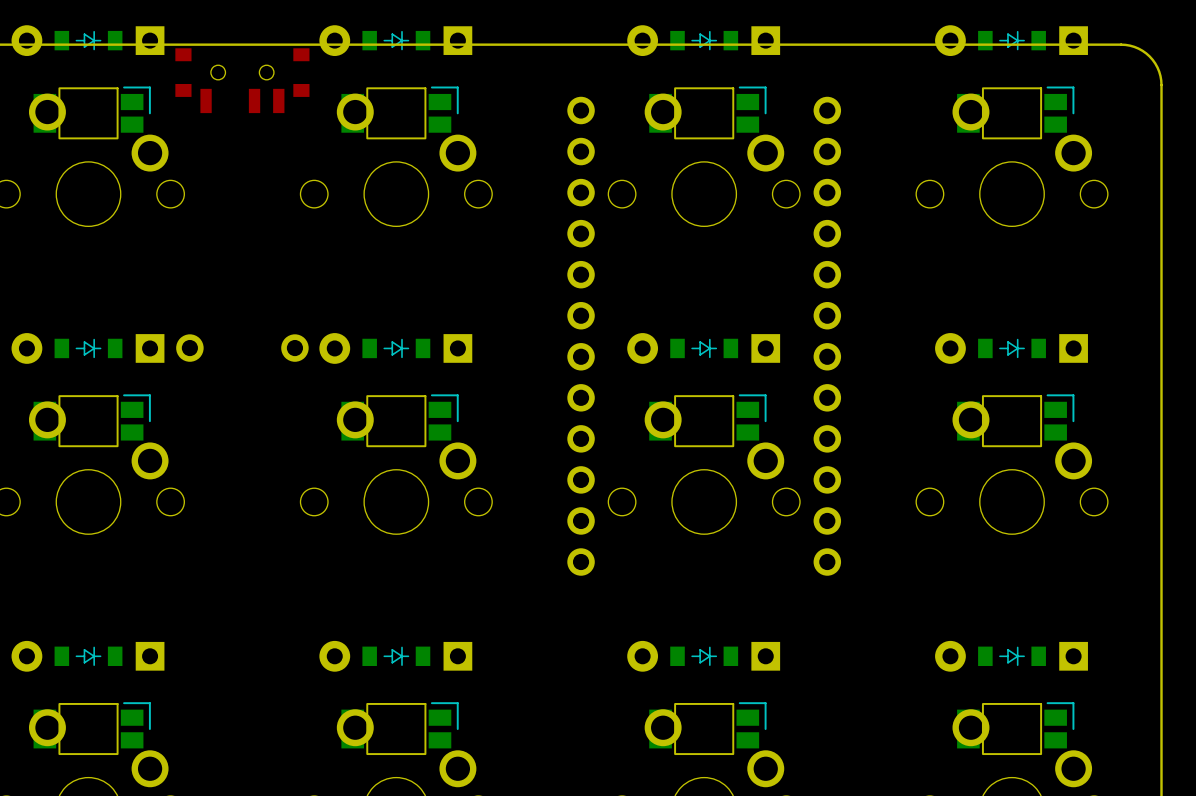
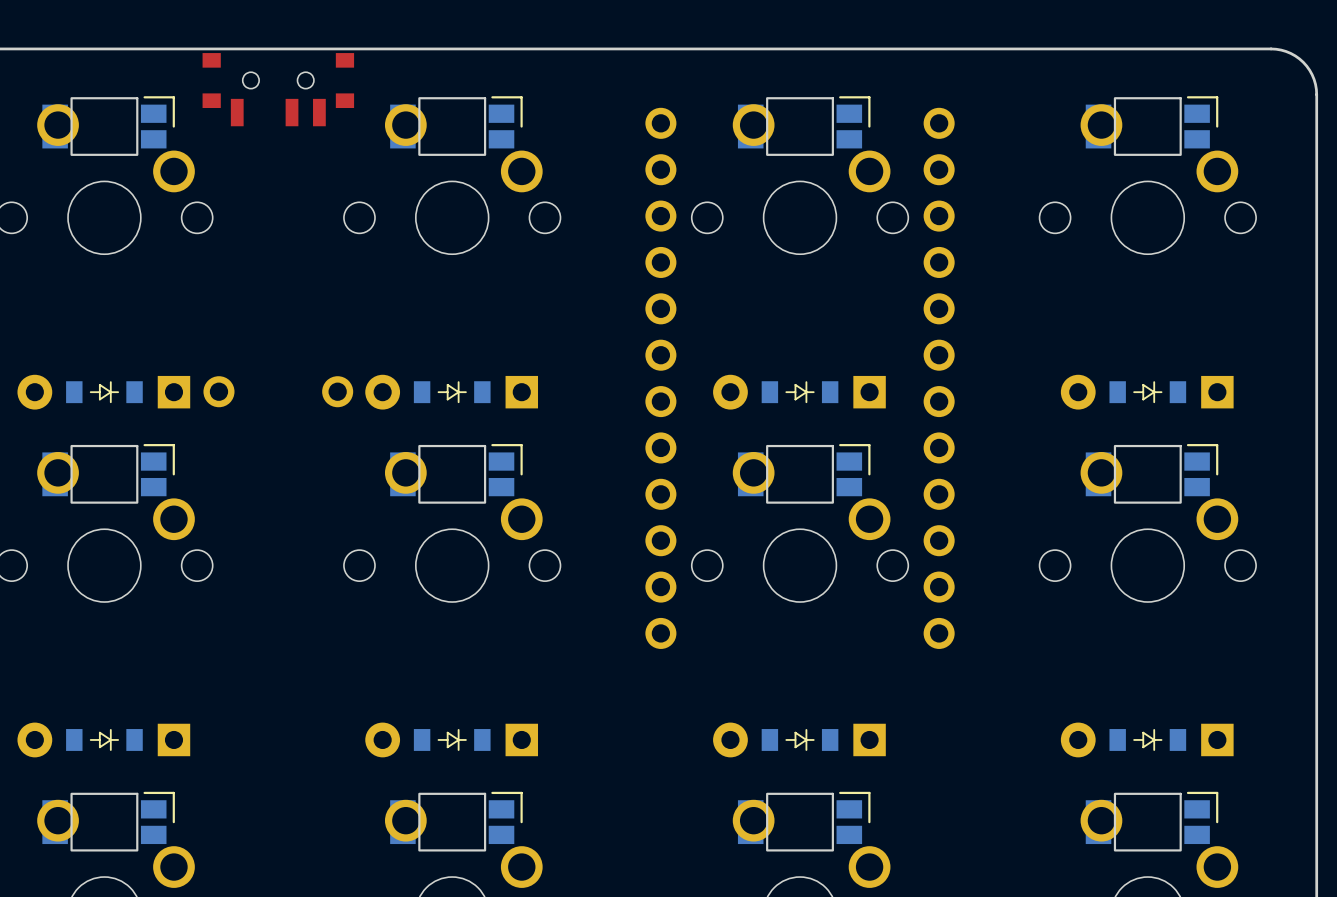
part: (87, 40) -> none
part: (395, 40) -> none
part: (703, 40) -> none
part: (1011, 40) -> none

